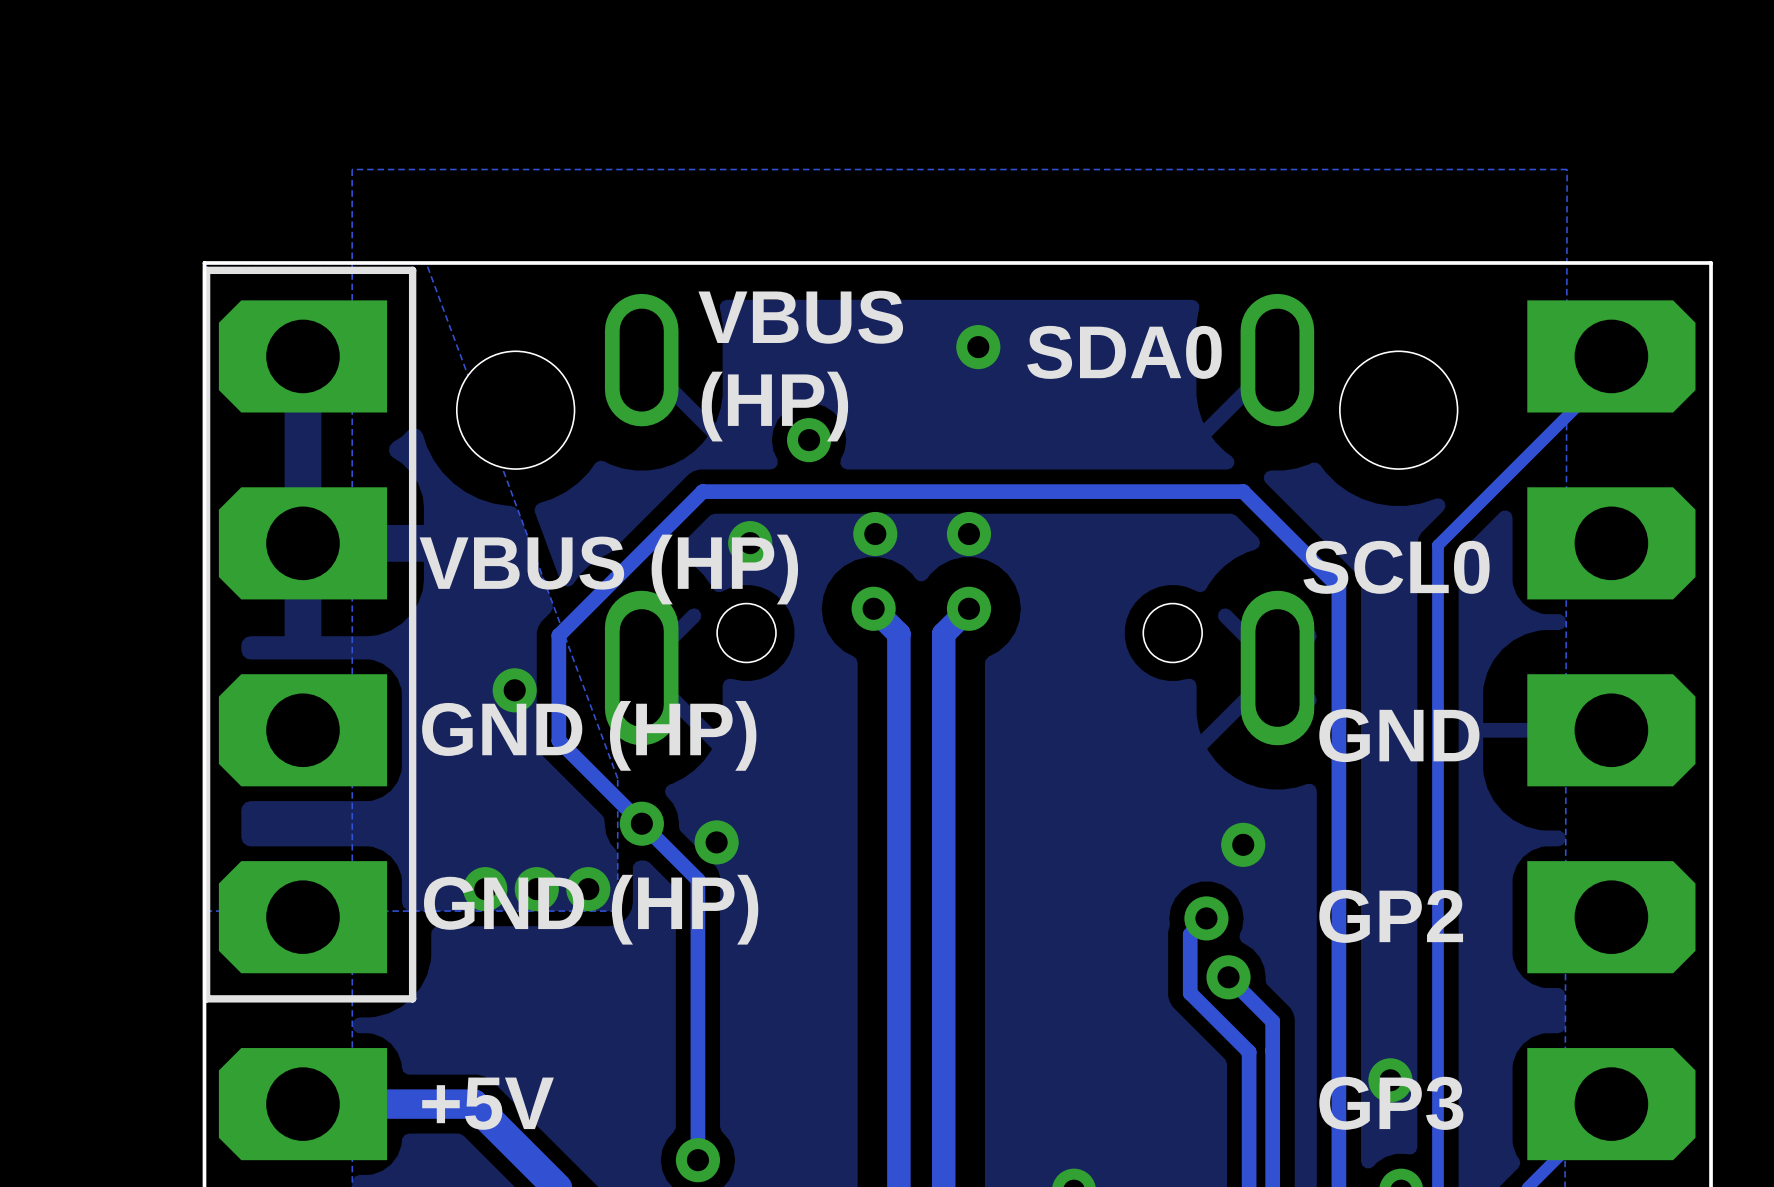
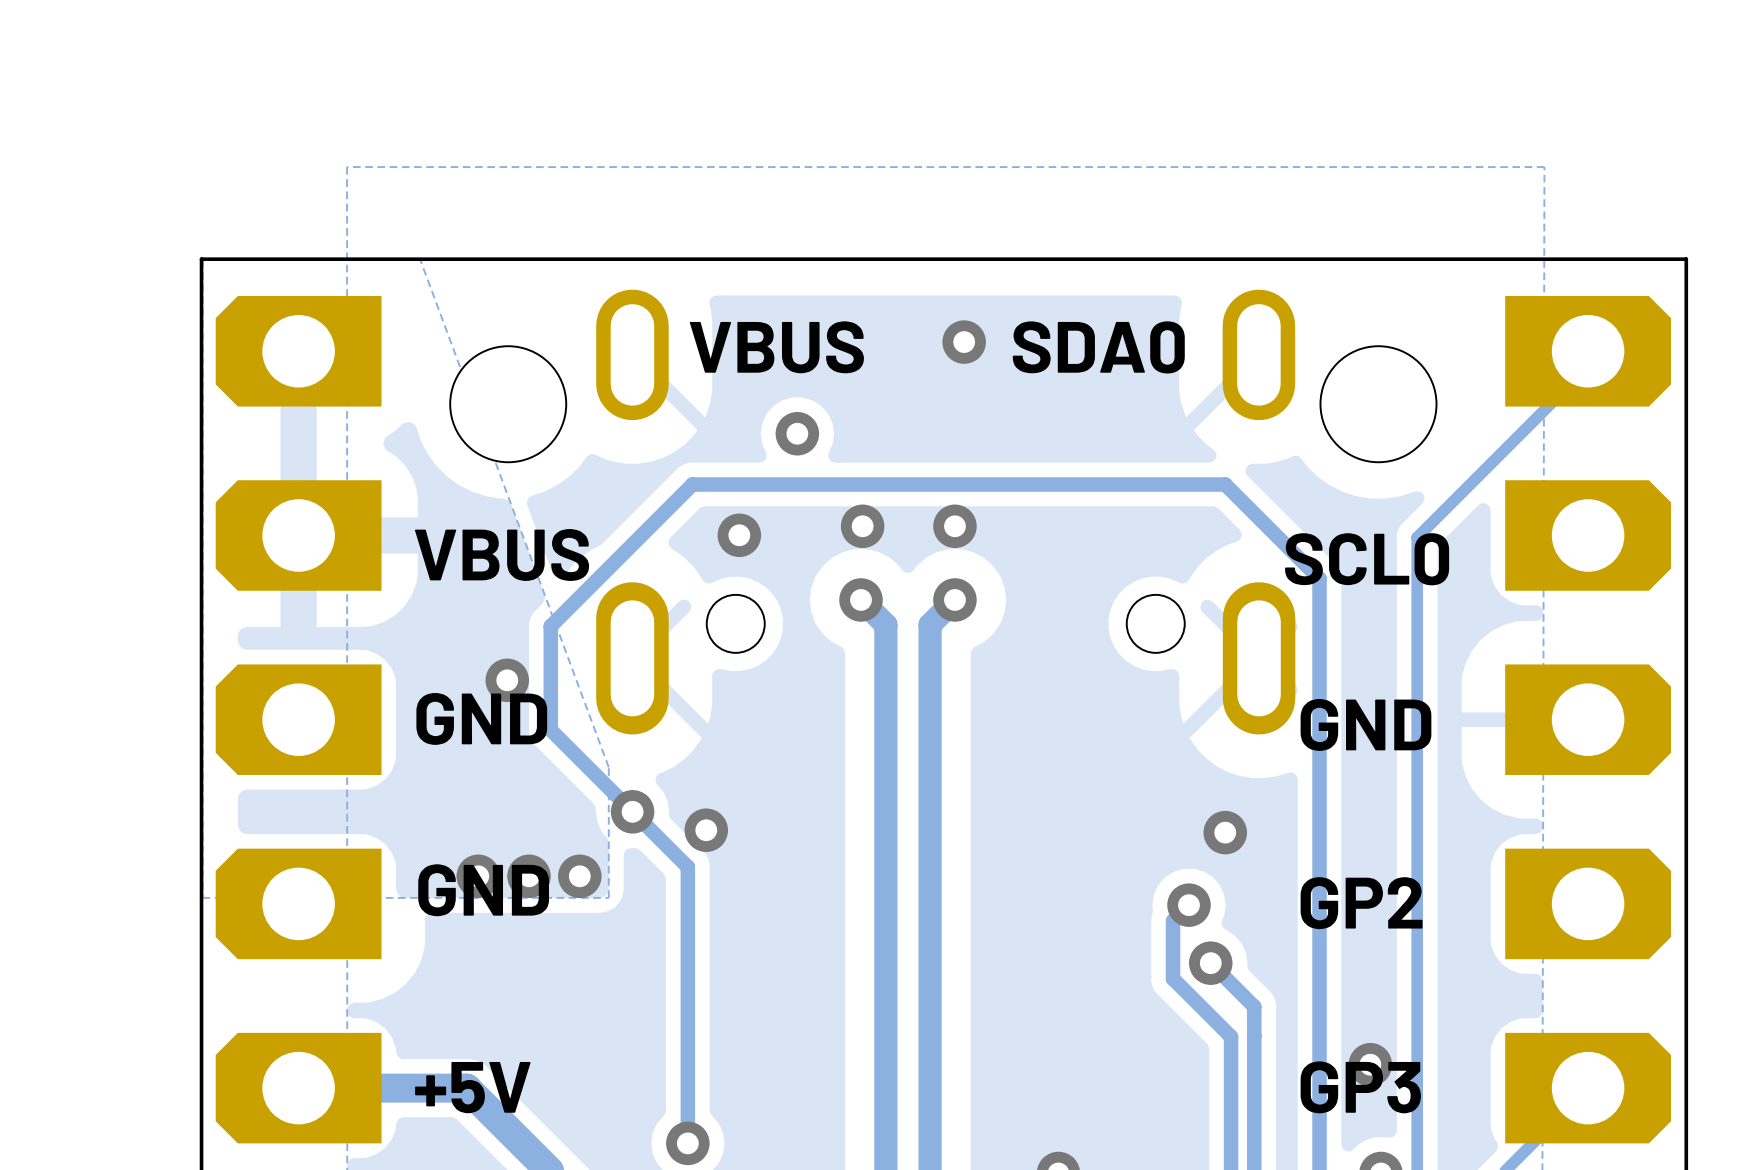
line: (412, 270) (206, 270) (206, 998) (412, 998) (412, 270) -> none
text position: VBUS (800, 317) -> VBUS (776, 347)
text: (HP) (774, 406) -> none
text: VBUS (HP) (608, 569) -> VBUS (502, 554)
text: GND (HP) (589, 735) -> GND (481, 718)
text: GND (HP) (591, 909) -> GND (483, 890)

